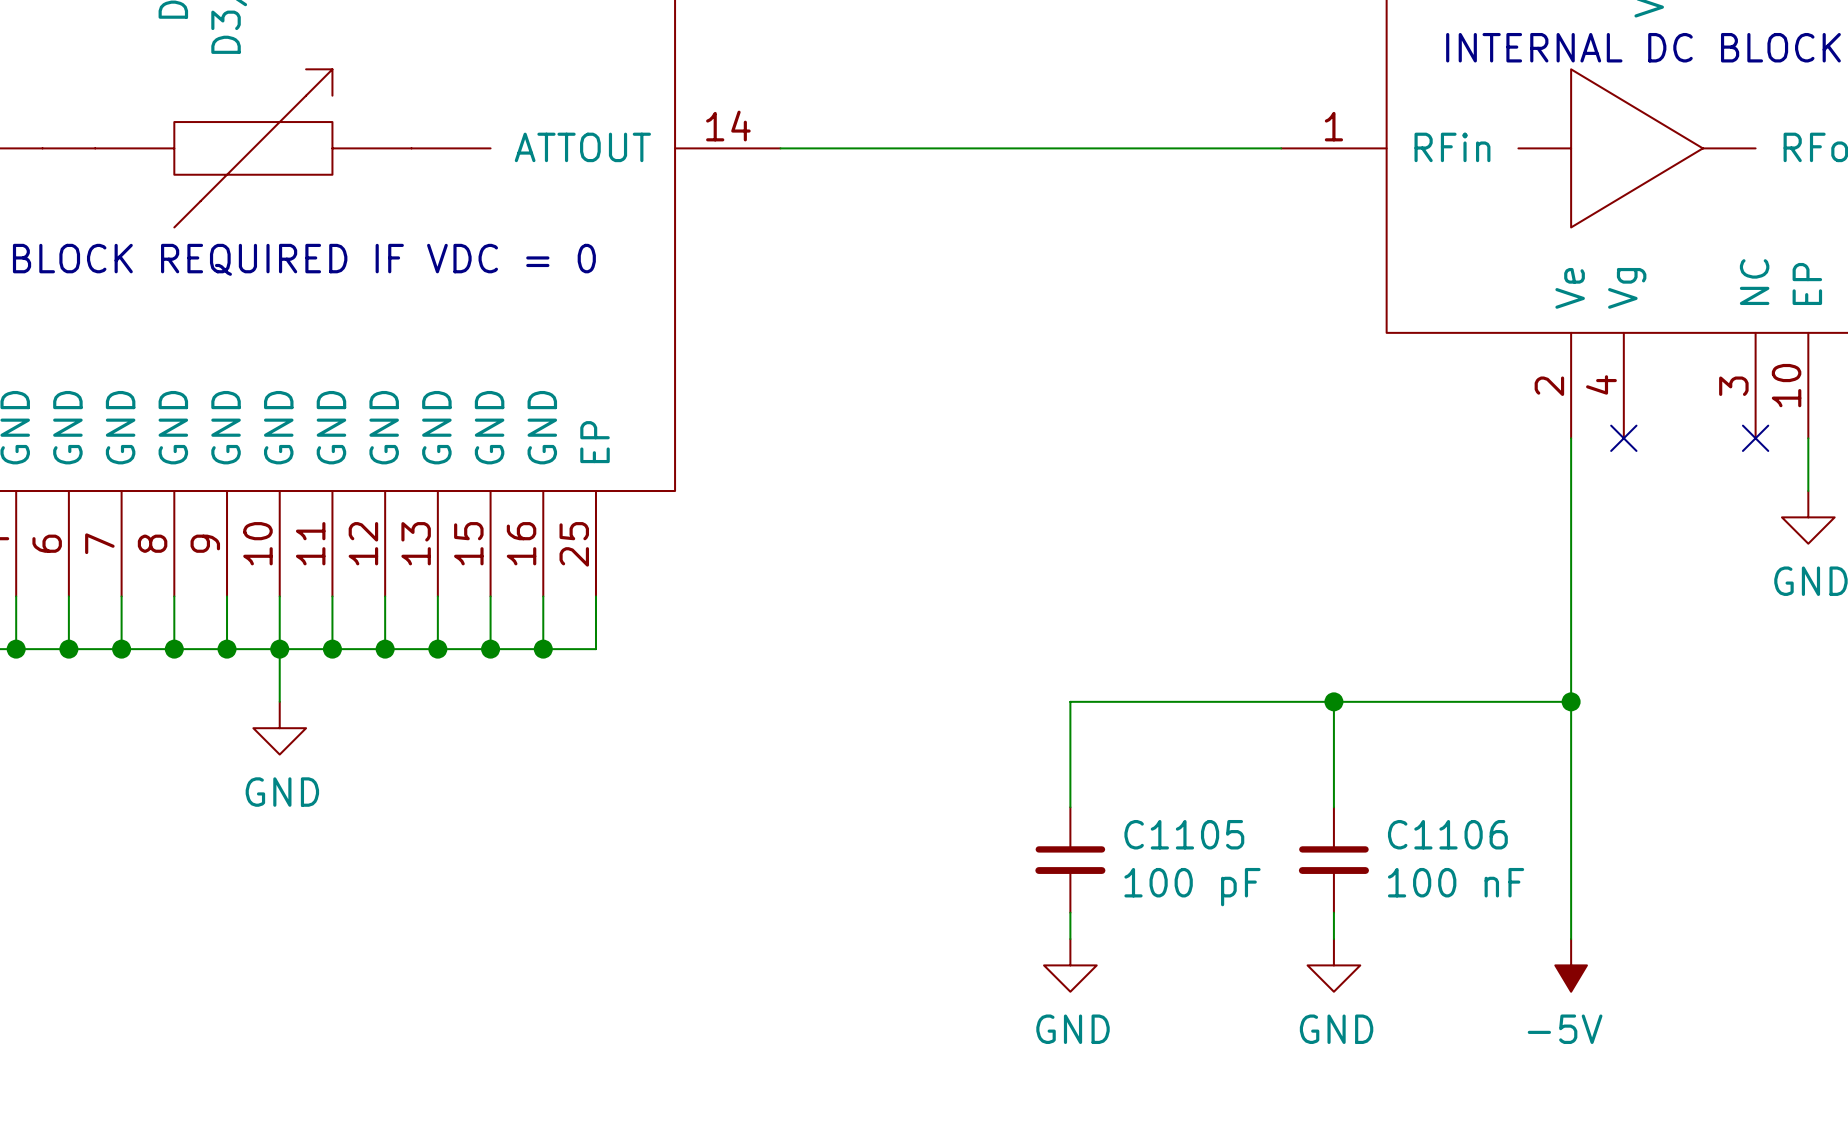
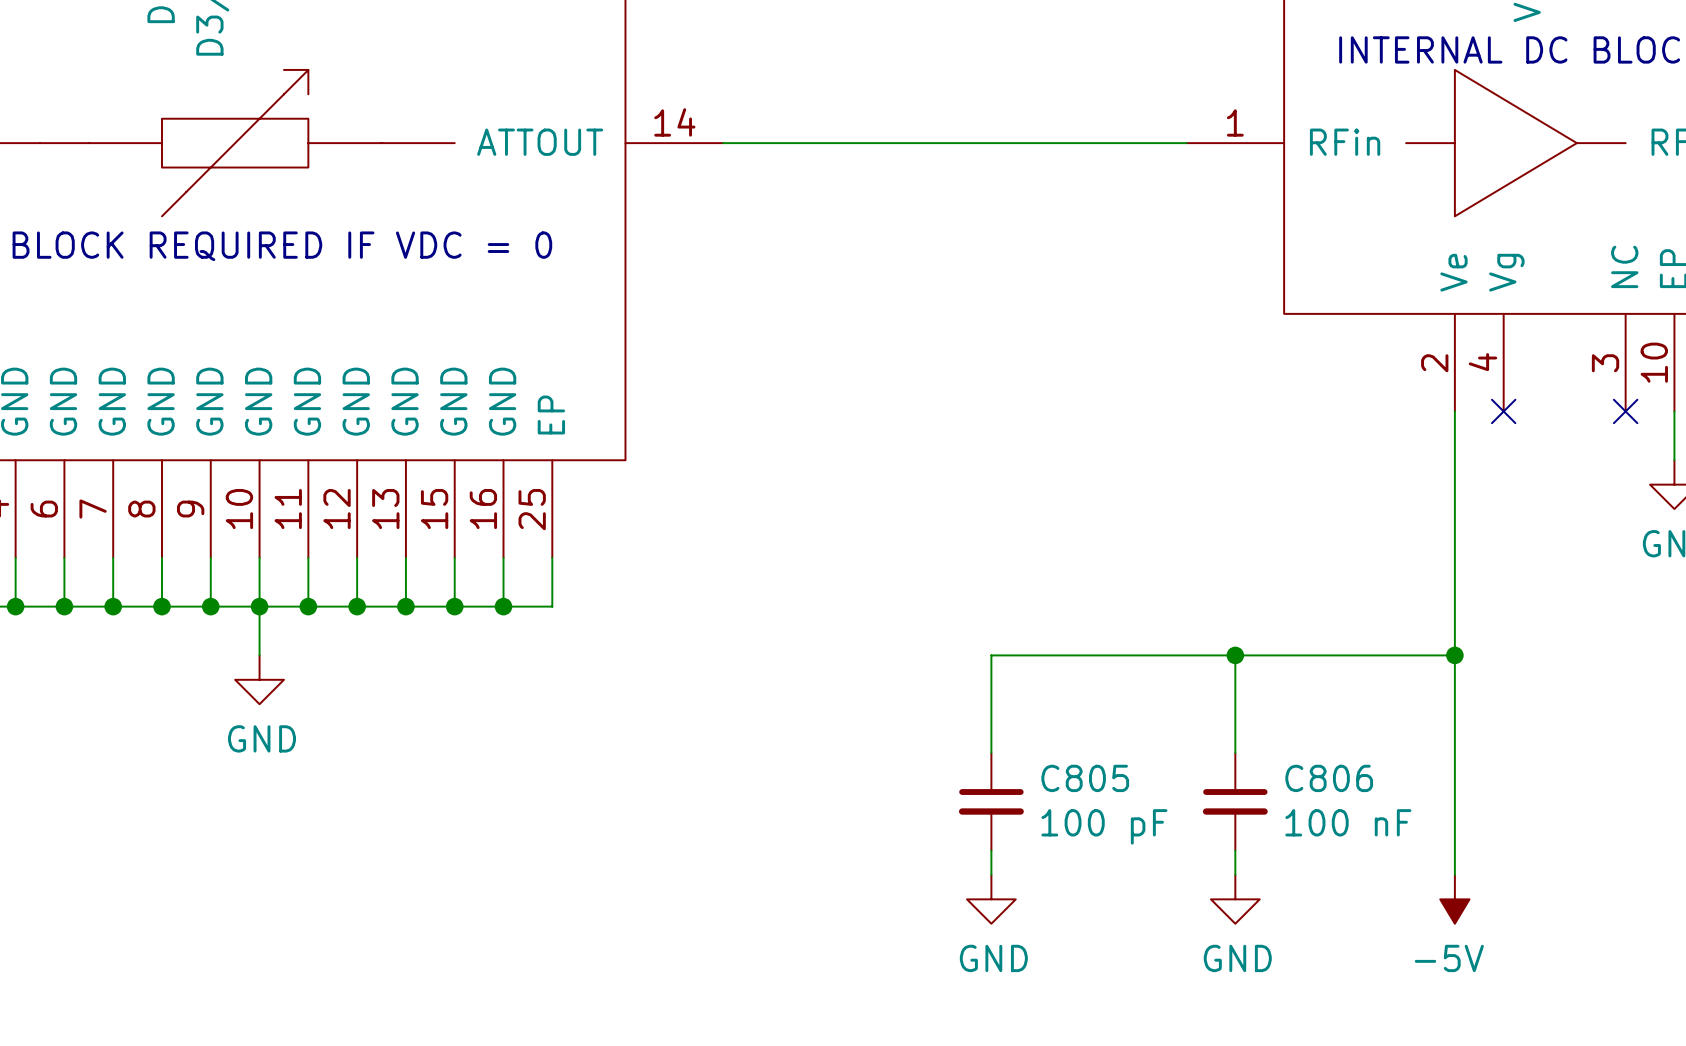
C1105 name: C1105 (1184, 834) -> C805 (1085, 778)
C1106 name: C1106 (1447, 834) -> C806 (1329, 778)

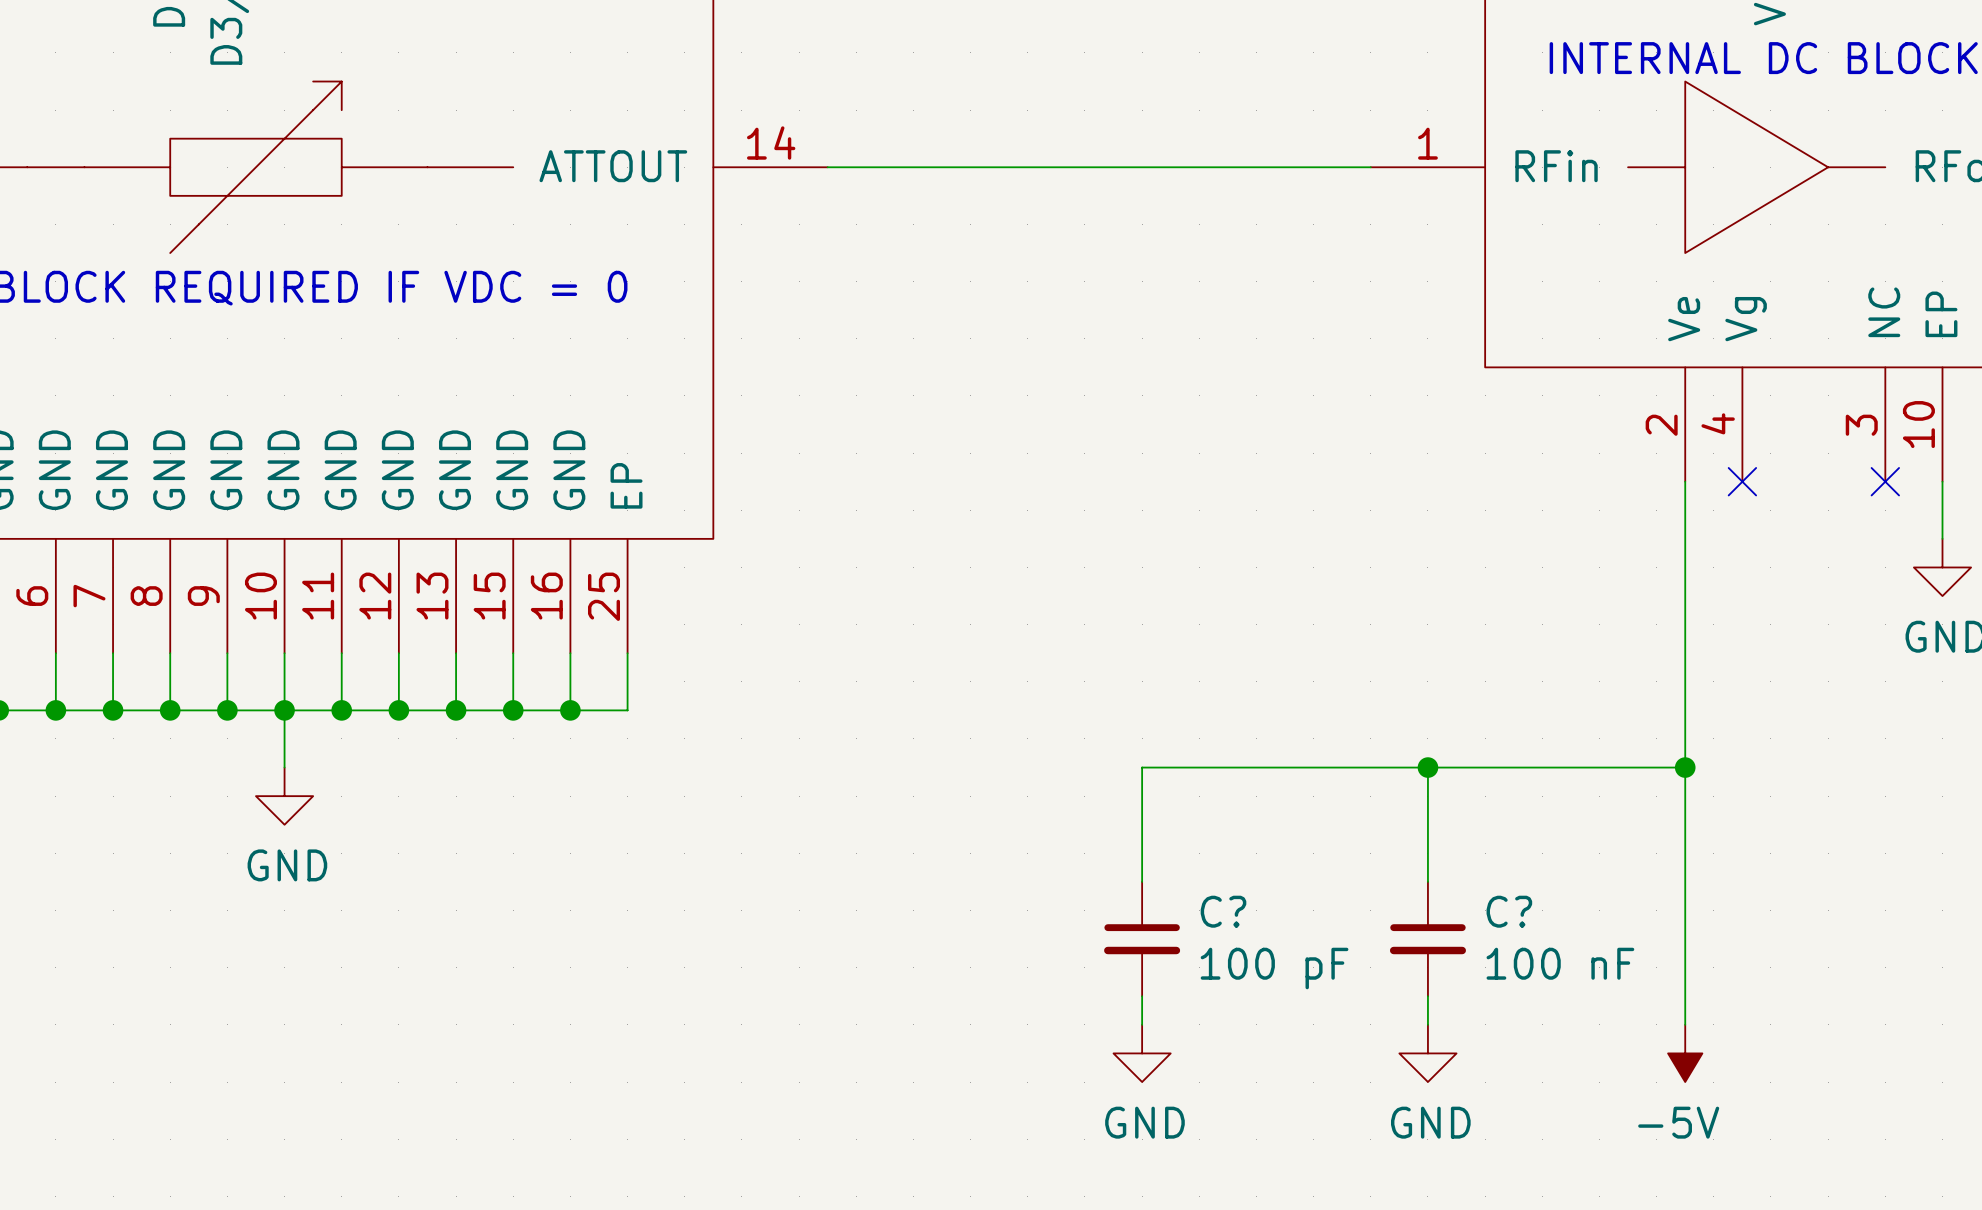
C805 name: C805 (1085, 778) -> C? (1223, 911)
C806 name: C806 (1329, 778) -> C? (1509, 911)

